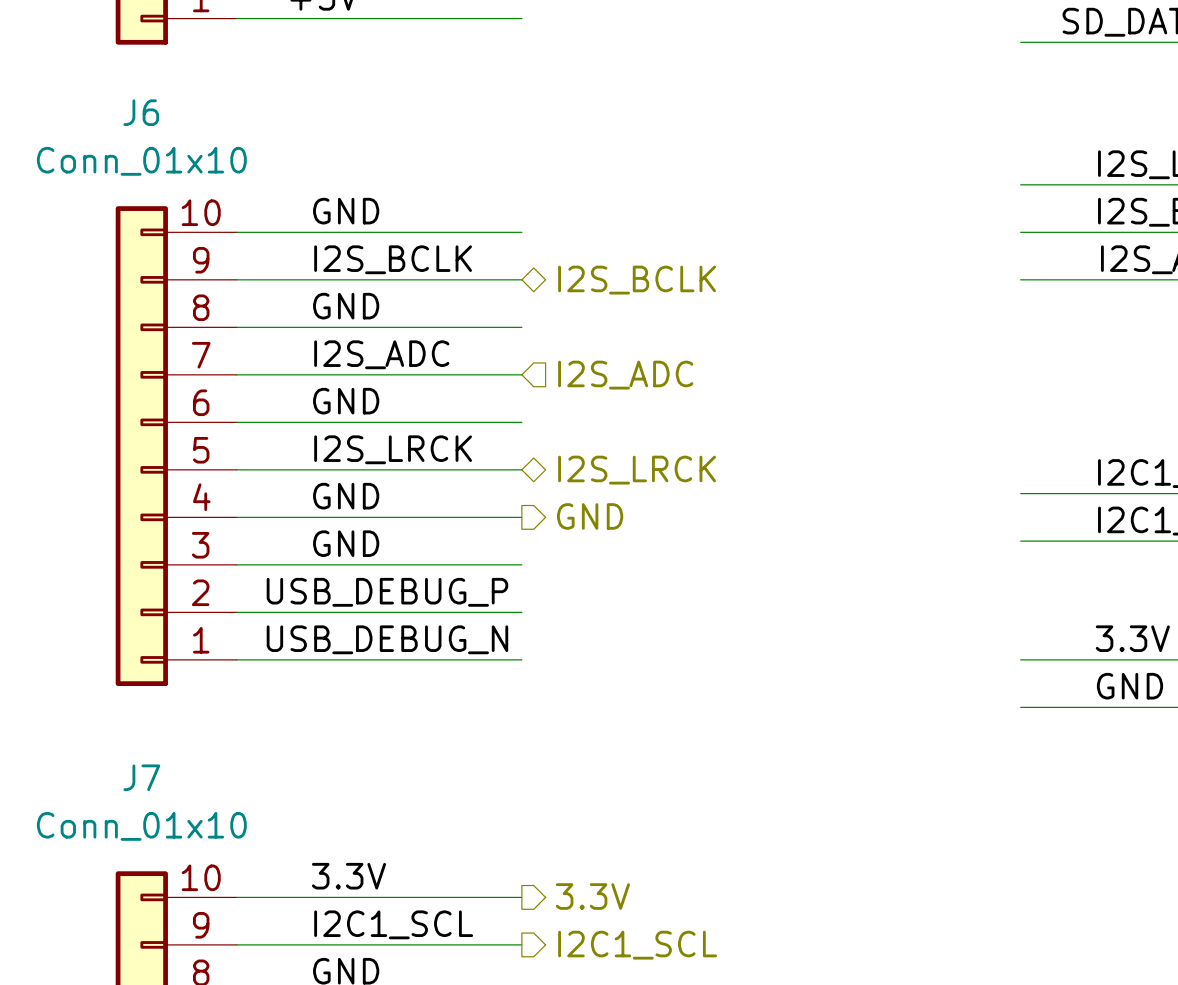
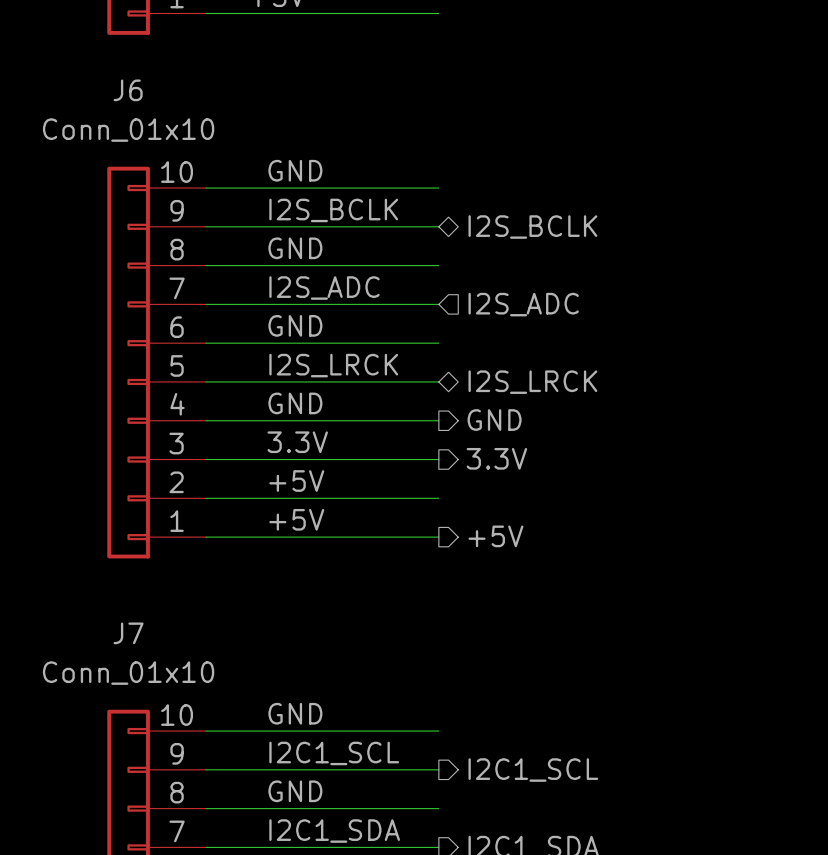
label: GND (346, 543) -> 3.3V (297, 442)
label: none -> +5V (296, 481)
label: USB_DEBUG_P (387, 592) -> none
label: none -> +5V (296, 519)
label: USB_DEBUG_N (387, 639) -> none
hierarchical label: none -> +5V (495, 536)
label: 3.3V (348, 876) -> GND (295, 713)
hierarchical label position: 3.3V (592, 896) -> 3.3V (496, 458)

